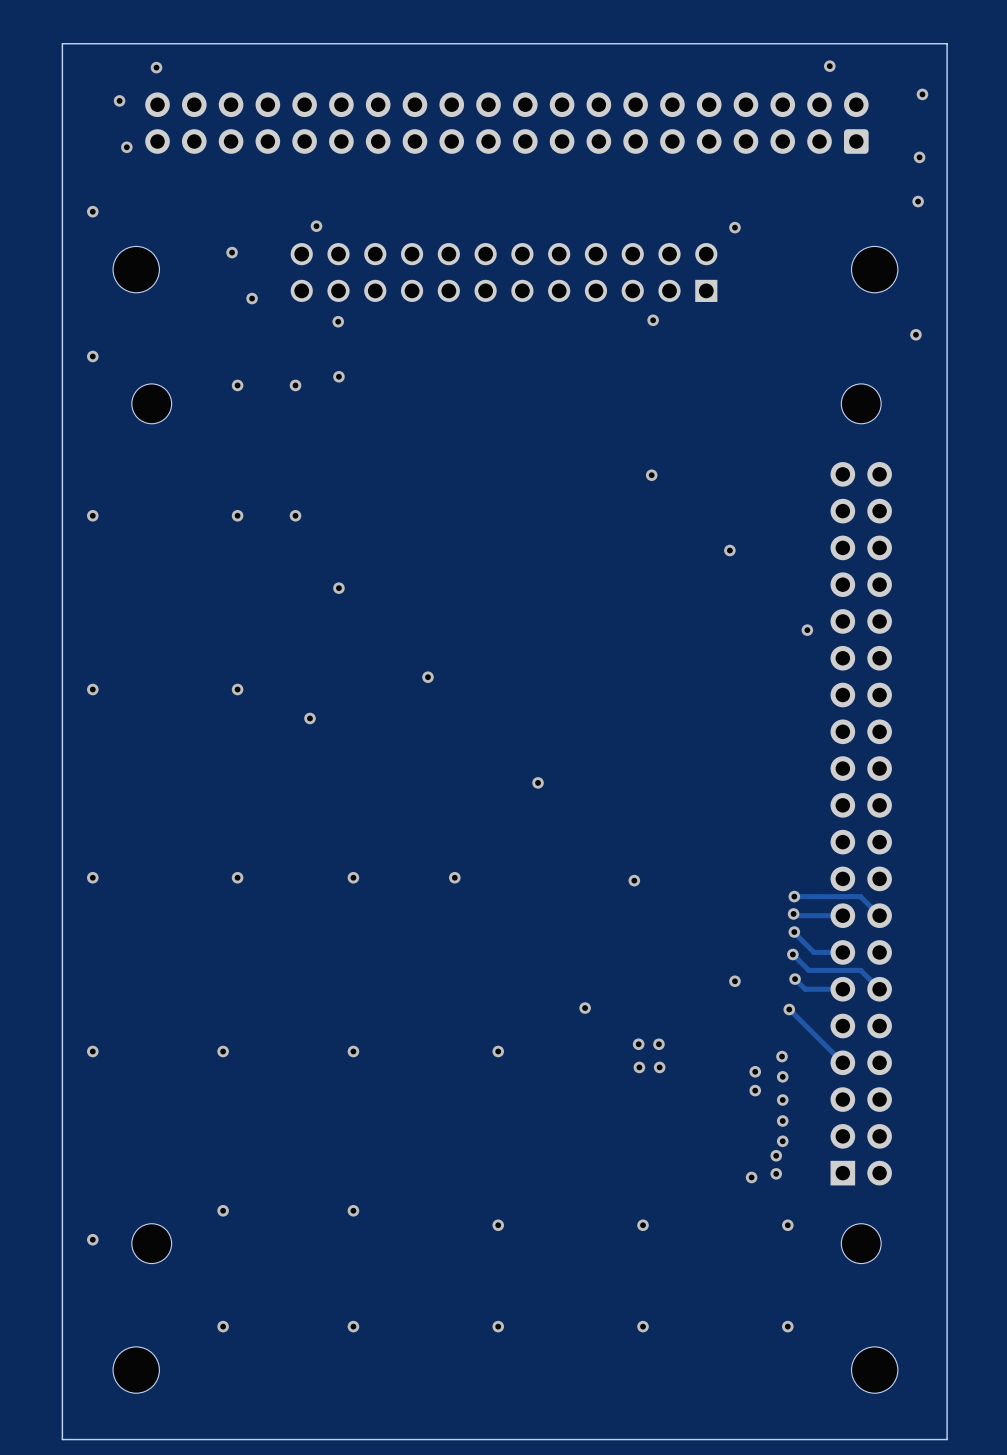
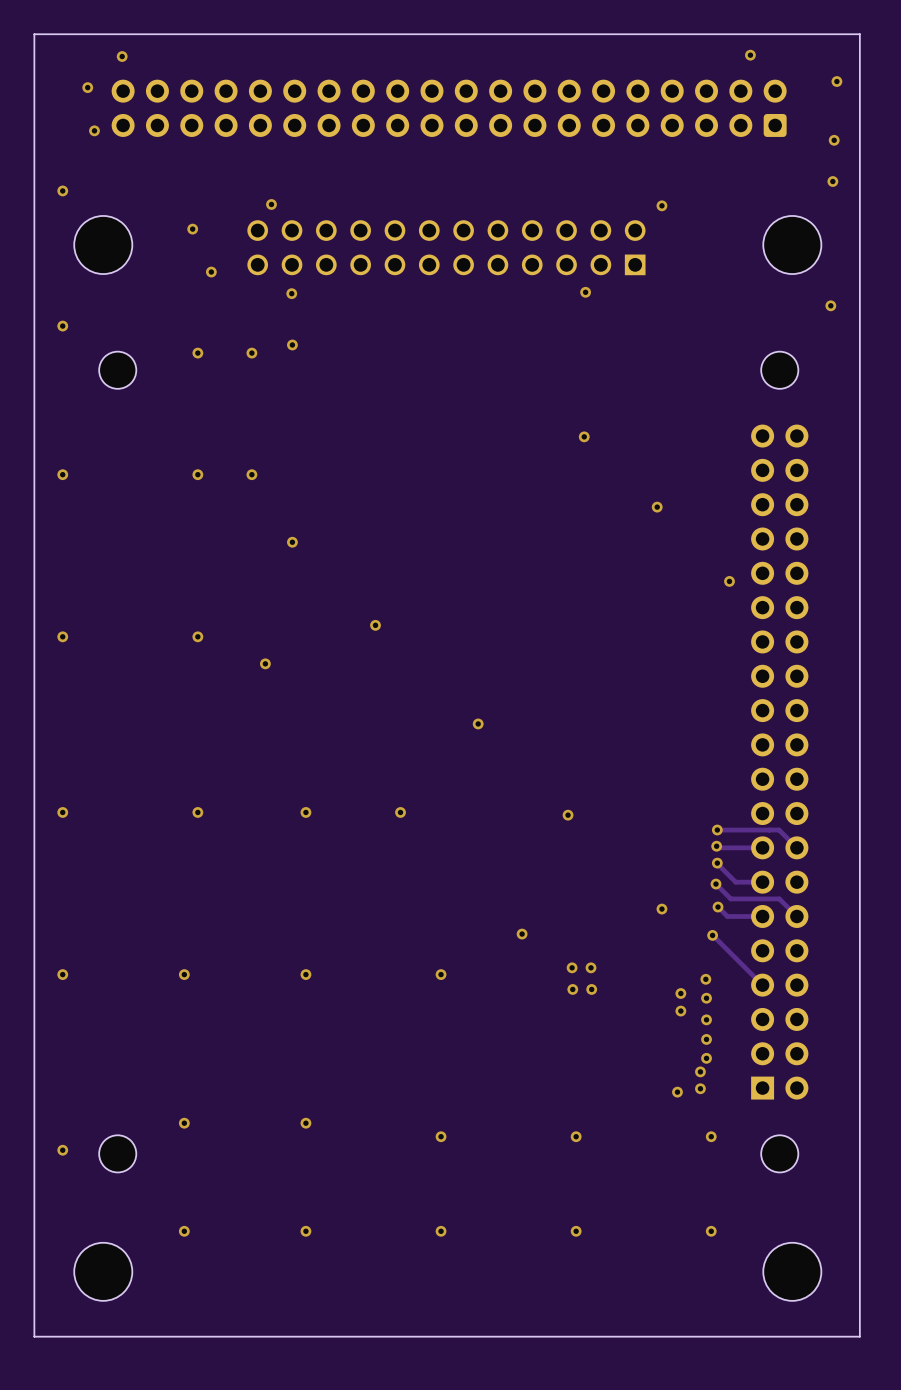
part footprint: [113, 246, 160, 293] -> [74, 215, 133, 275]
part footprint: [851, 246, 898, 293] -> [763, 215, 822, 275]
part footprint: [113, 1346, 160, 1394] -> [74, 1242, 133, 1301]
part footprint: [851, 1346, 898, 1394] -> [763, 1242, 822, 1301]

